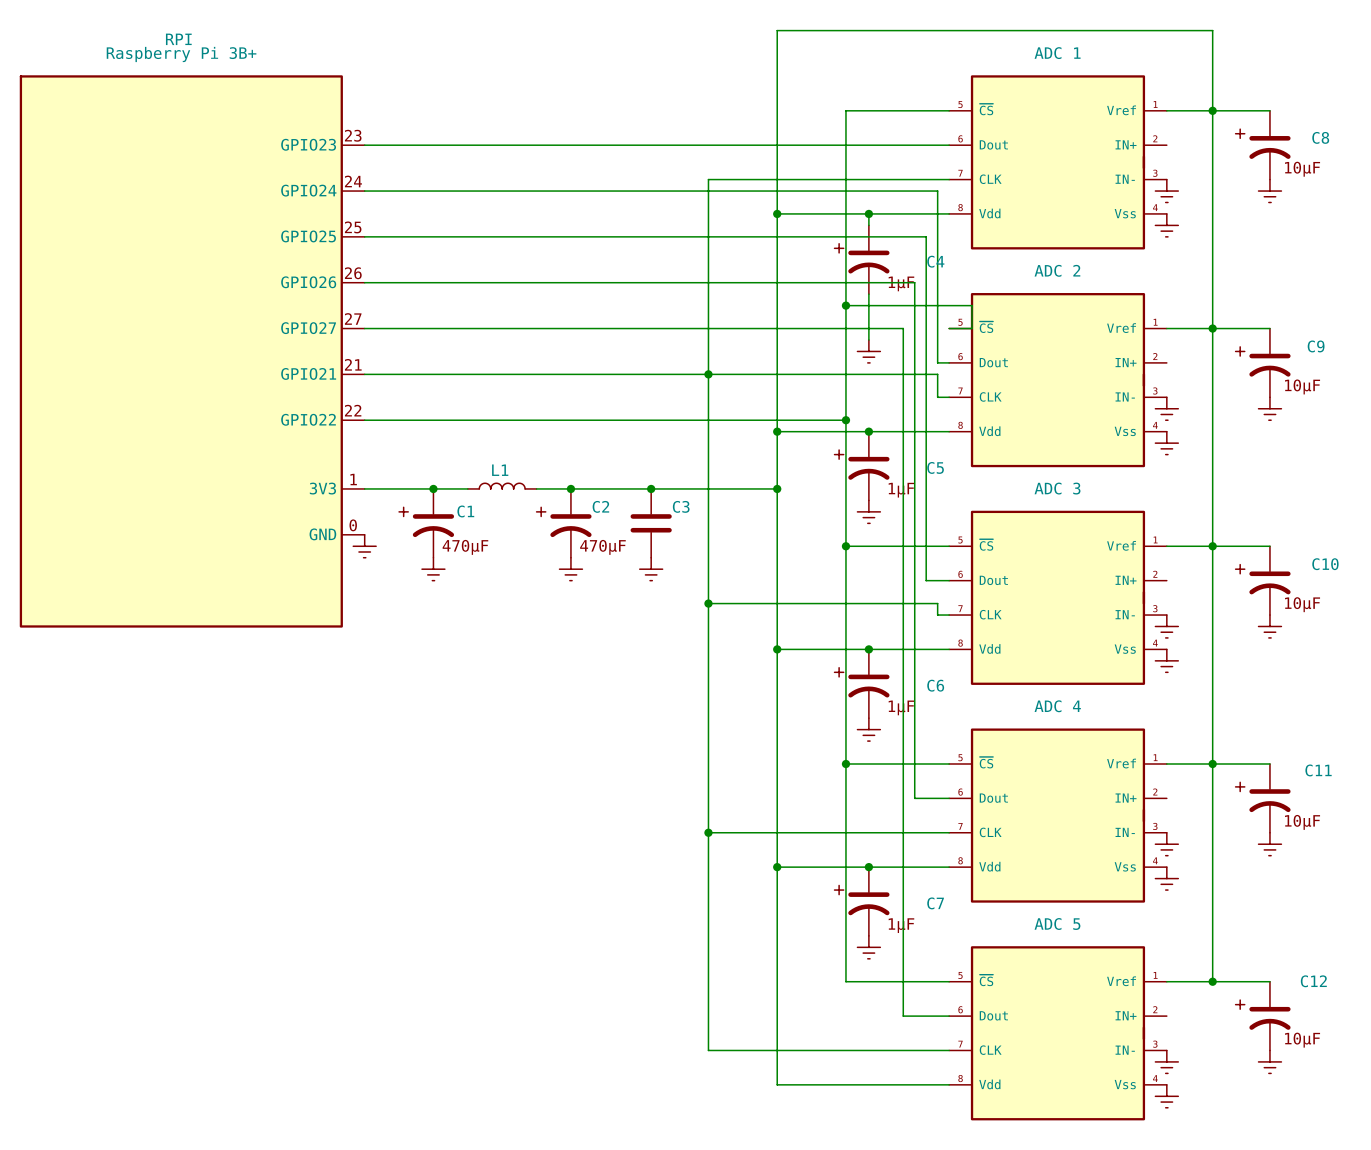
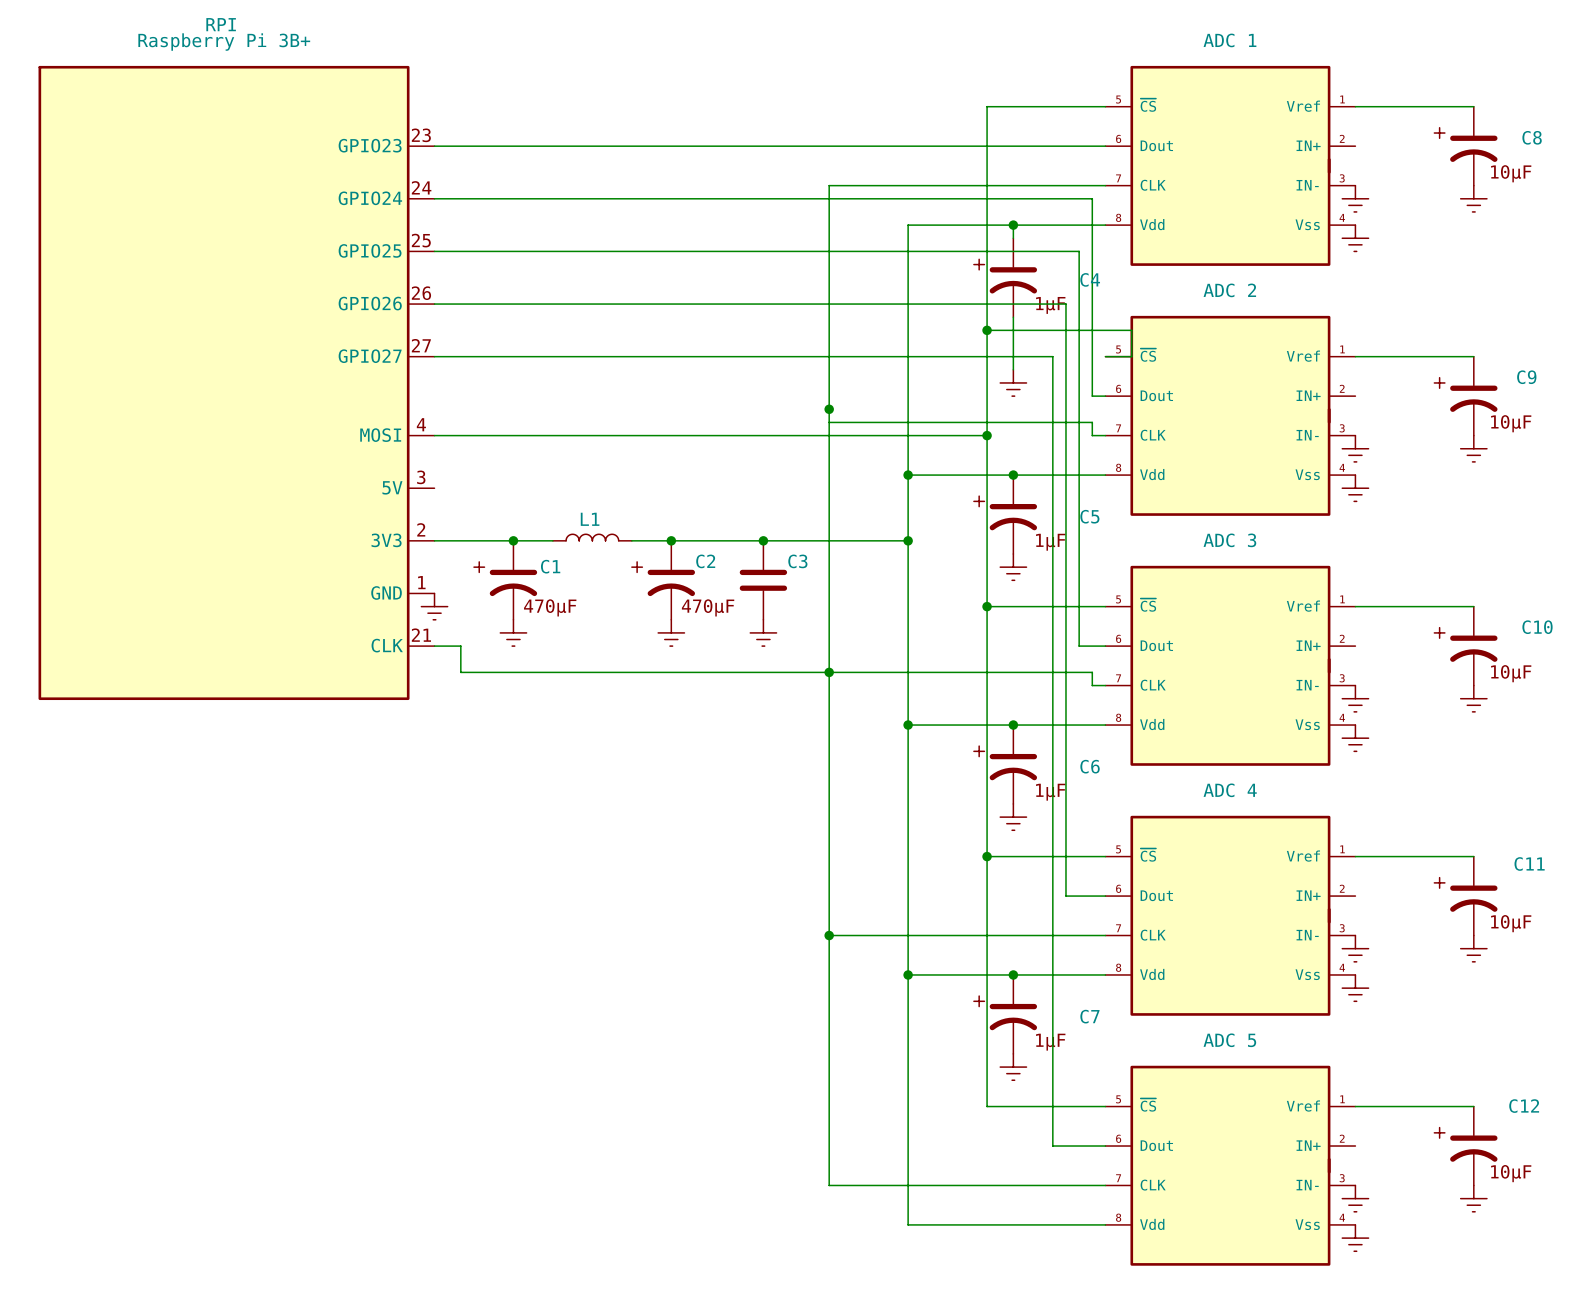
RPI symbol: [19, 75, 365, 628] -> [38, 65, 435, 701]
junction: (1212, 110) -> none
wire: (777, 213) (777, 30) (1212, 30) (1212, 981) -> none
junction: (777, 213) -> none
junction: (1212, 328) -> none
wire: (364, 374) (937, 374) (937, 385) -> (829, 422) (1092, 422)
wire: (364, 420) (845, 420) -> (434, 435) (987, 435)
junction position: (845, 420) -> (987, 435)
junction: (1212, 546) -> none
wire: none -> (434, 646) (460, 646) (460, 672) (829, 672)
junction: (1212, 763) -> none
junction: (1212, 981) -> none

